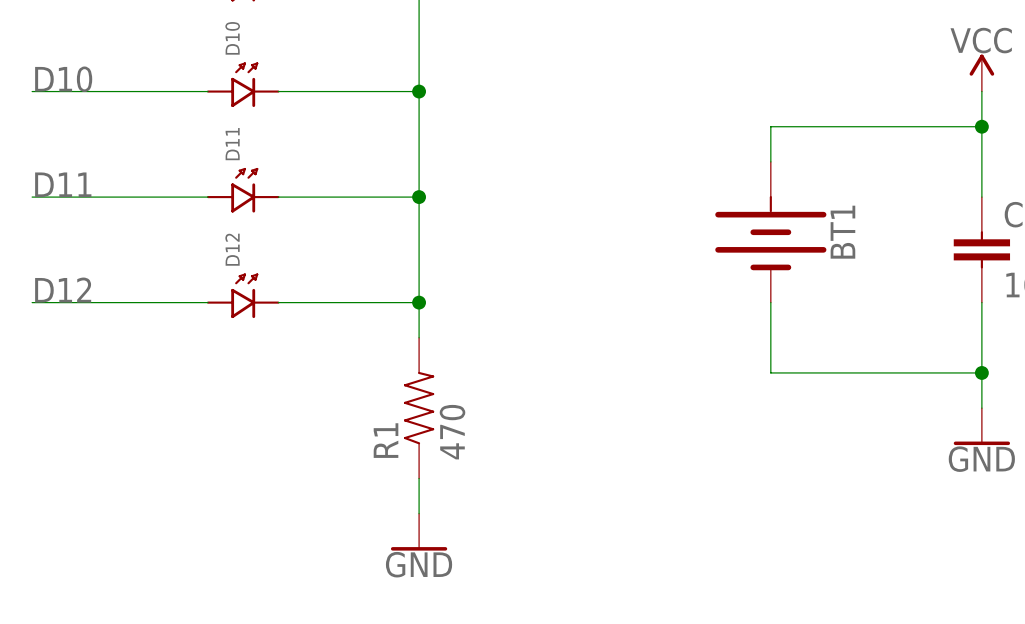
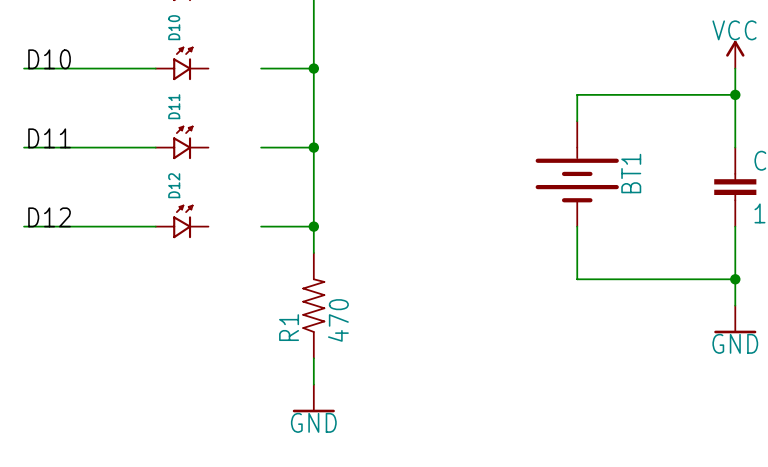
wire: (278, 91) (348, 91) -> none
wire: (278, 197) (348, 197) -> none
wire: (278, 302) (348, 302) -> none

